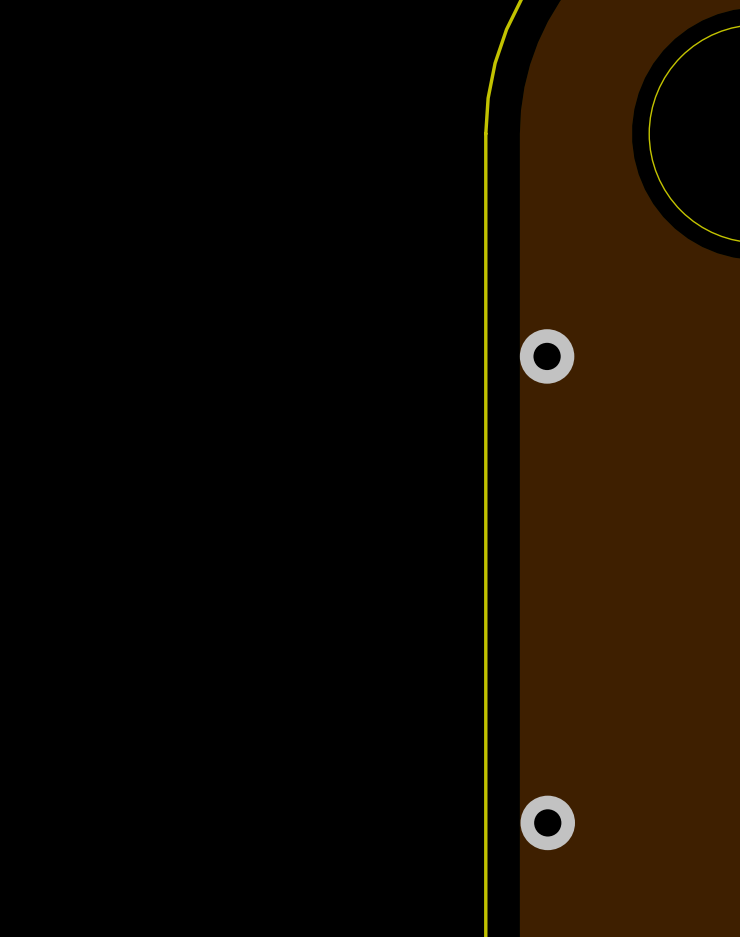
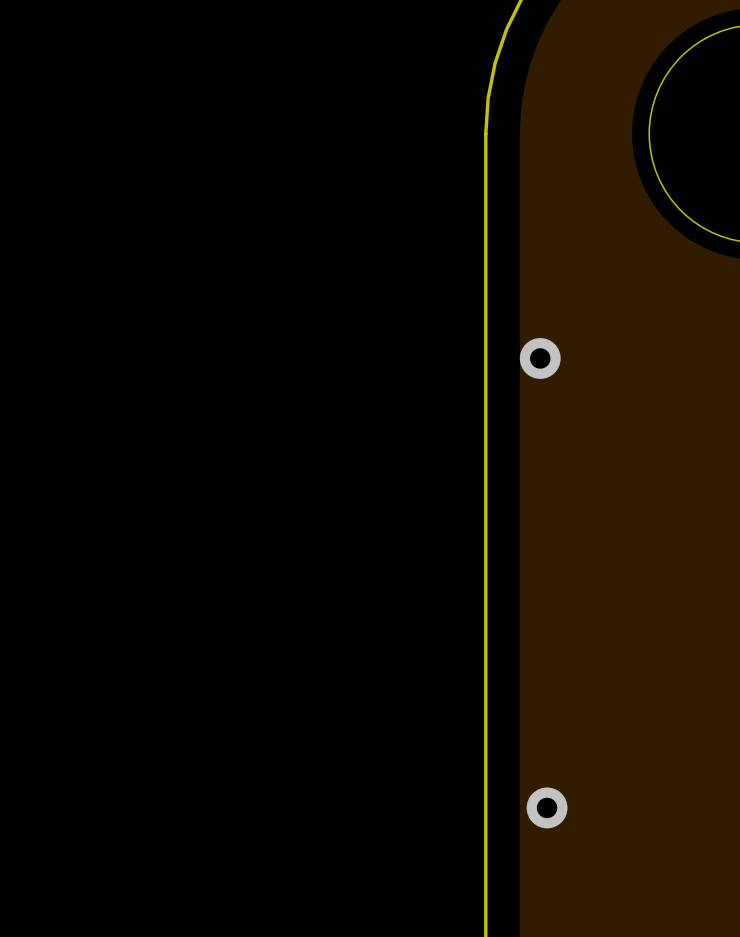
via size: [519, 329, 575, 384] -> [519, 338, 561, 379]
via size: [520, 795, 576, 851] -> [526, 787, 568, 829]

